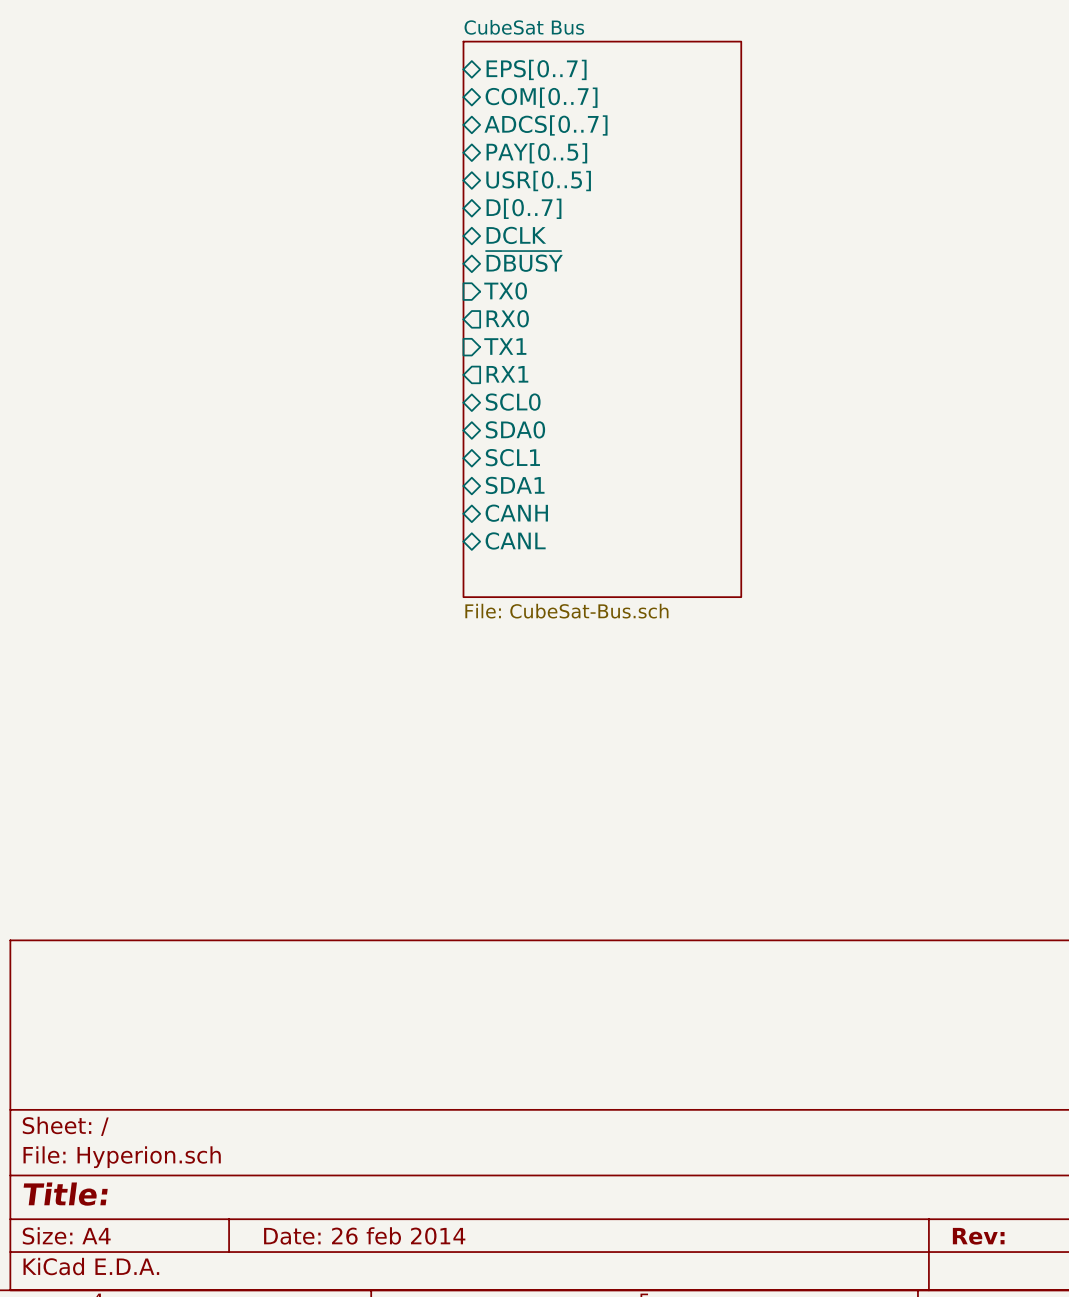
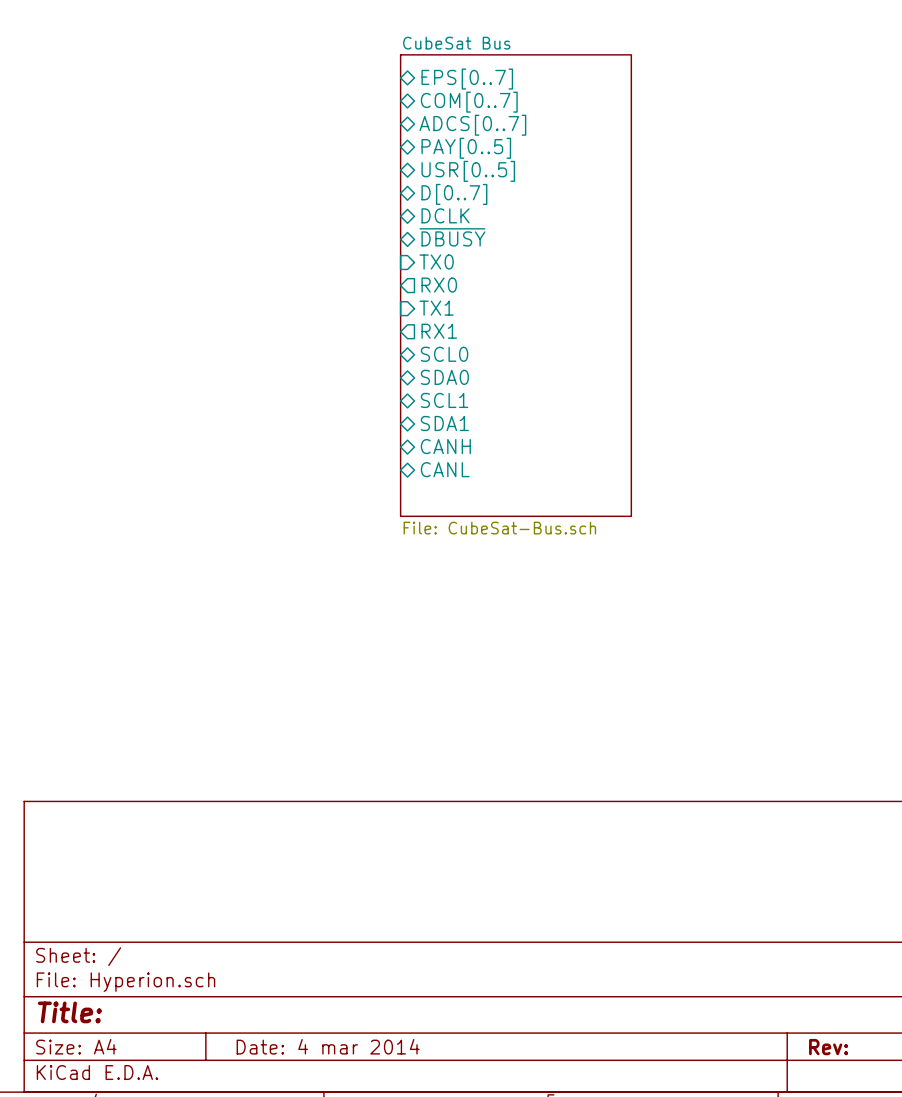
title block: Date: 26 feb 2014 (364, 1235) -> Date: 4 mar 2014 (328, 1046)

